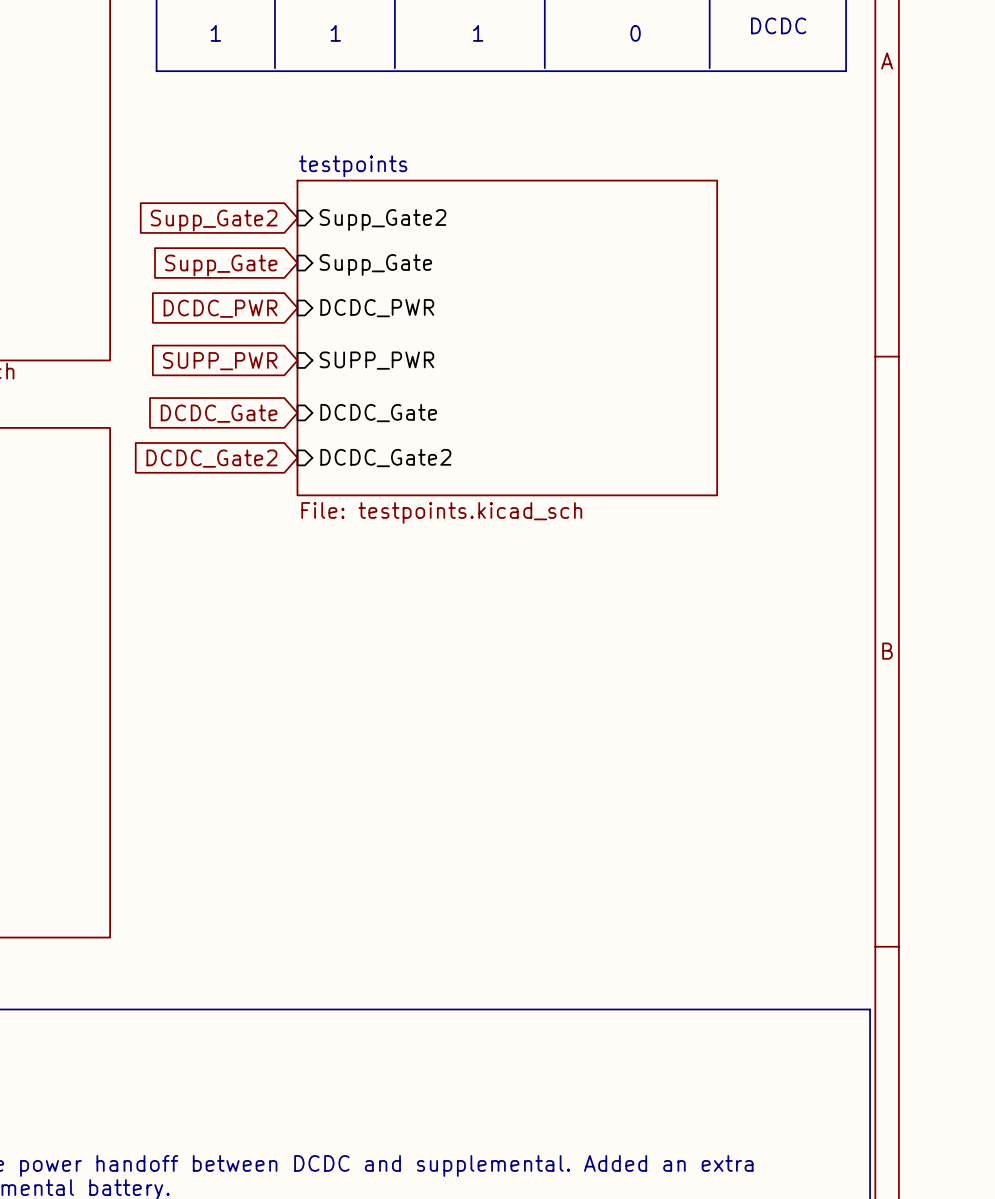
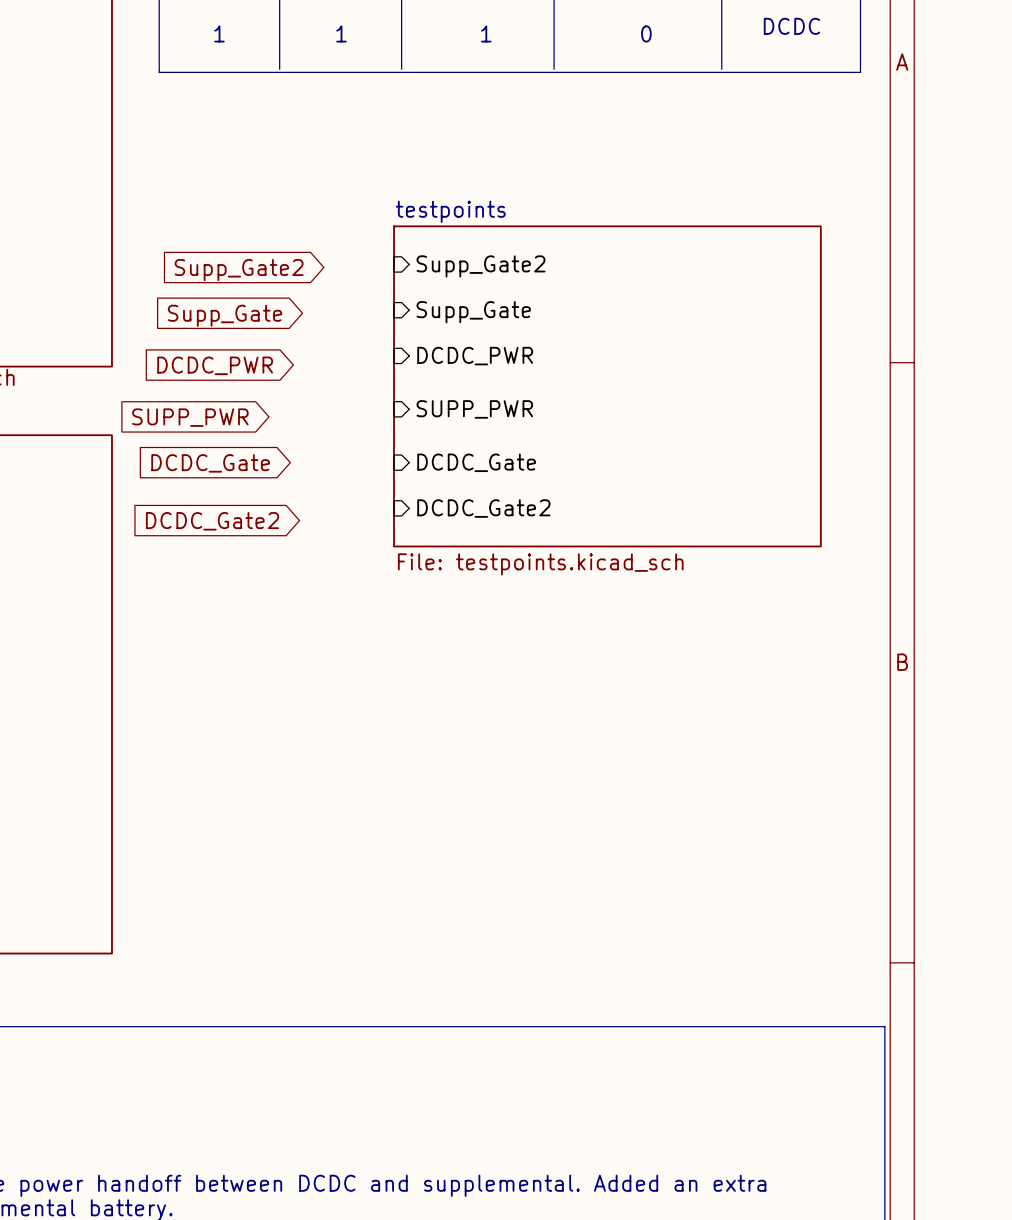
sheet pin position: Supp_Gate2 (382, 219) -> Supp_Gate2 (480, 266)
global label position: Supp_Gate2 (214, 220) -> Supp_Gate2 (239, 270)
sheet pin position: Supp_Gate (375, 264) -> Supp_Gate (473, 312)
global label: Supp_Gate (221, 265) -> none
global label: DCDC_PWR (220, 308) -> Supp_Gate (225, 315)
sheet pin position: DCDC_PWR (377, 308) -> DCDC_PWR (475, 356)
sheet testpoints position: (507, 337) -> (607, 386)
global label: none -> DCDC_PWR (215, 365)
sheet pin position: SUPP_PWR (376, 360) -> SUPP_PWR (474, 409)
global label position: SUPP_PWR (220, 361) -> SUPP_PWR (190, 417)
global label position: DCDC_Gate (219, 413) -> DCDC_Gate (210, 463)
sheet pin position: DCDC_Gate (378, 413) -> DCDC_Gate (476, 462)
global label position: DCDC_Gate2 (211, 458) -> DCDC_Gate2 (212, 521)
sheet pin position: DCDC_Gate2 (385, 458) -> DCDC_Gate2 (483, 508)

